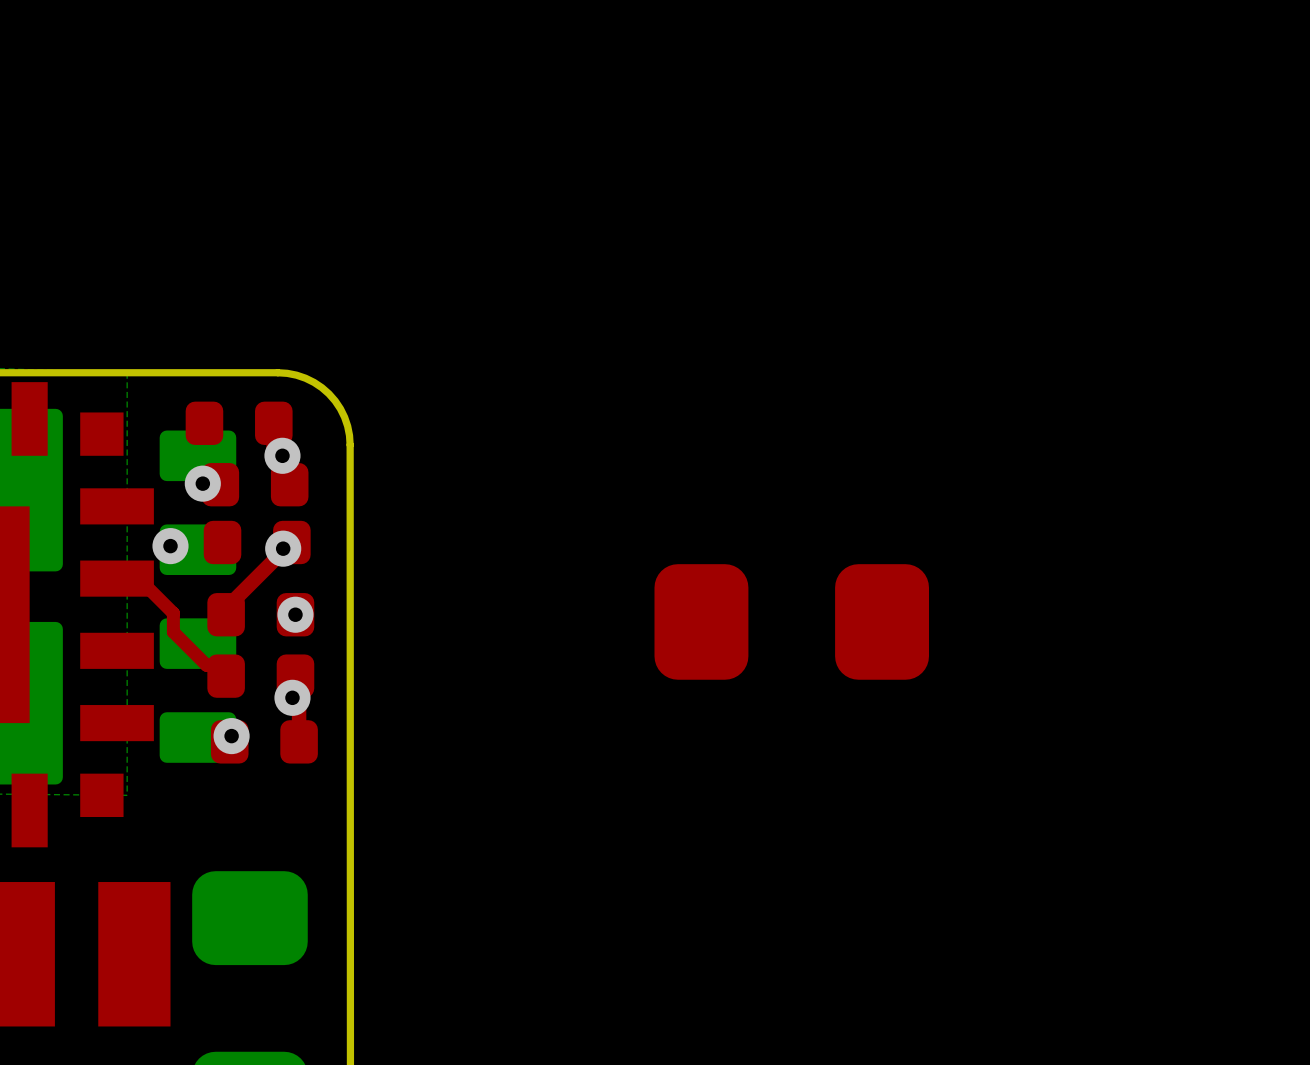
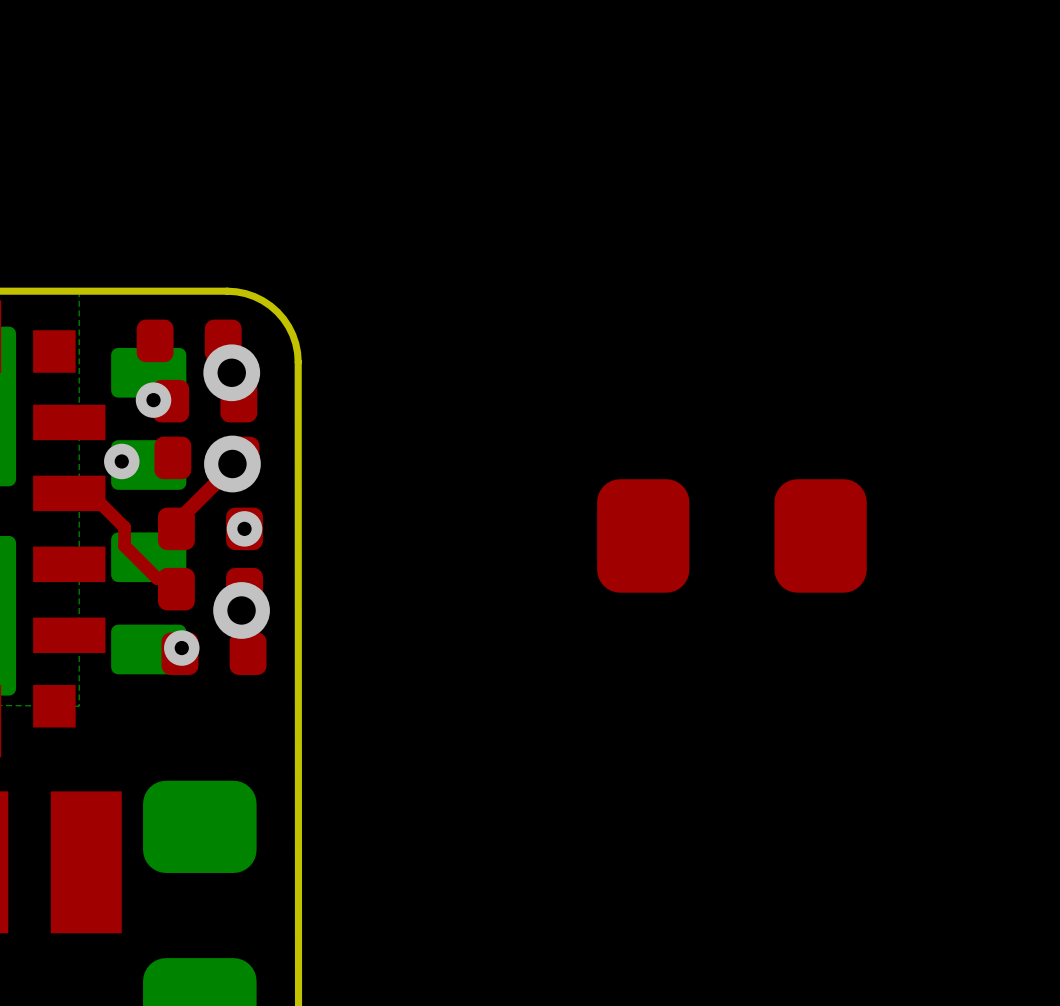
via size: [264, 437, 301, 474] -> [203, 344, 261, 402]
via size: [265, 530, 302, 567] -> [204, 435, 261, 493]
via size: [274, 679, 311, 716] -> [213, 582, 270, 639]

